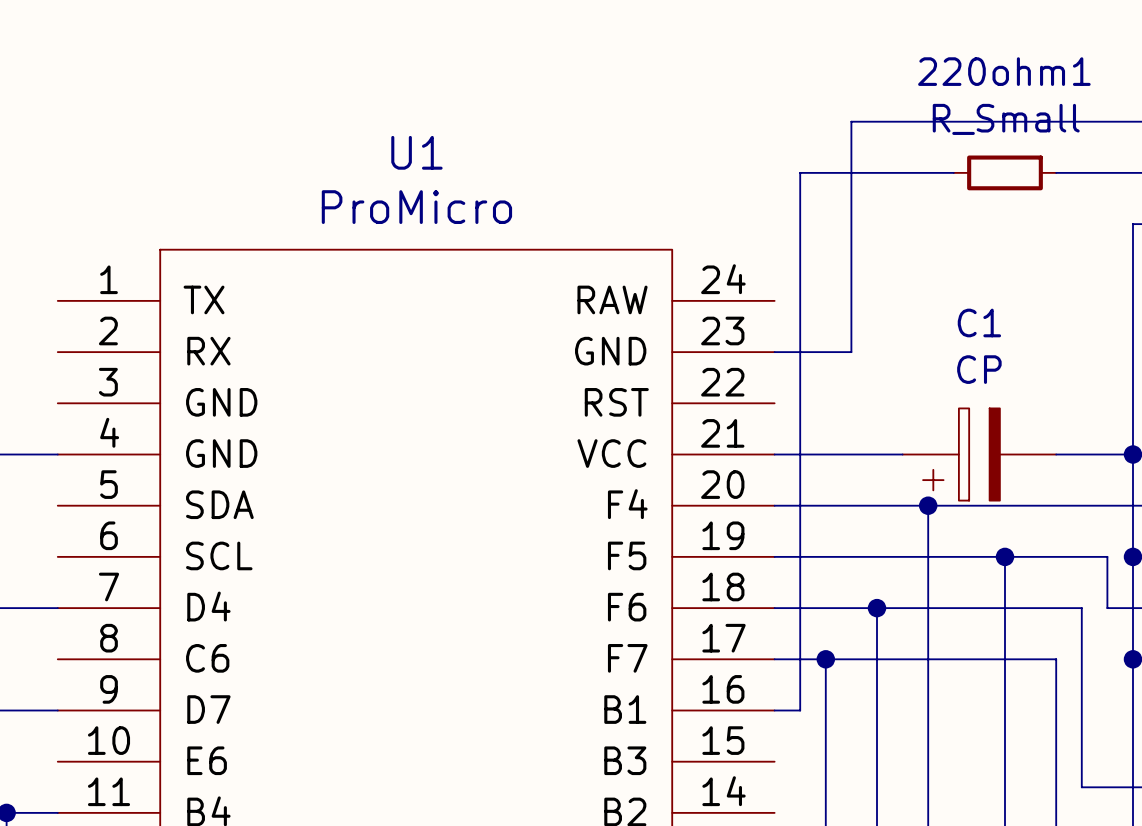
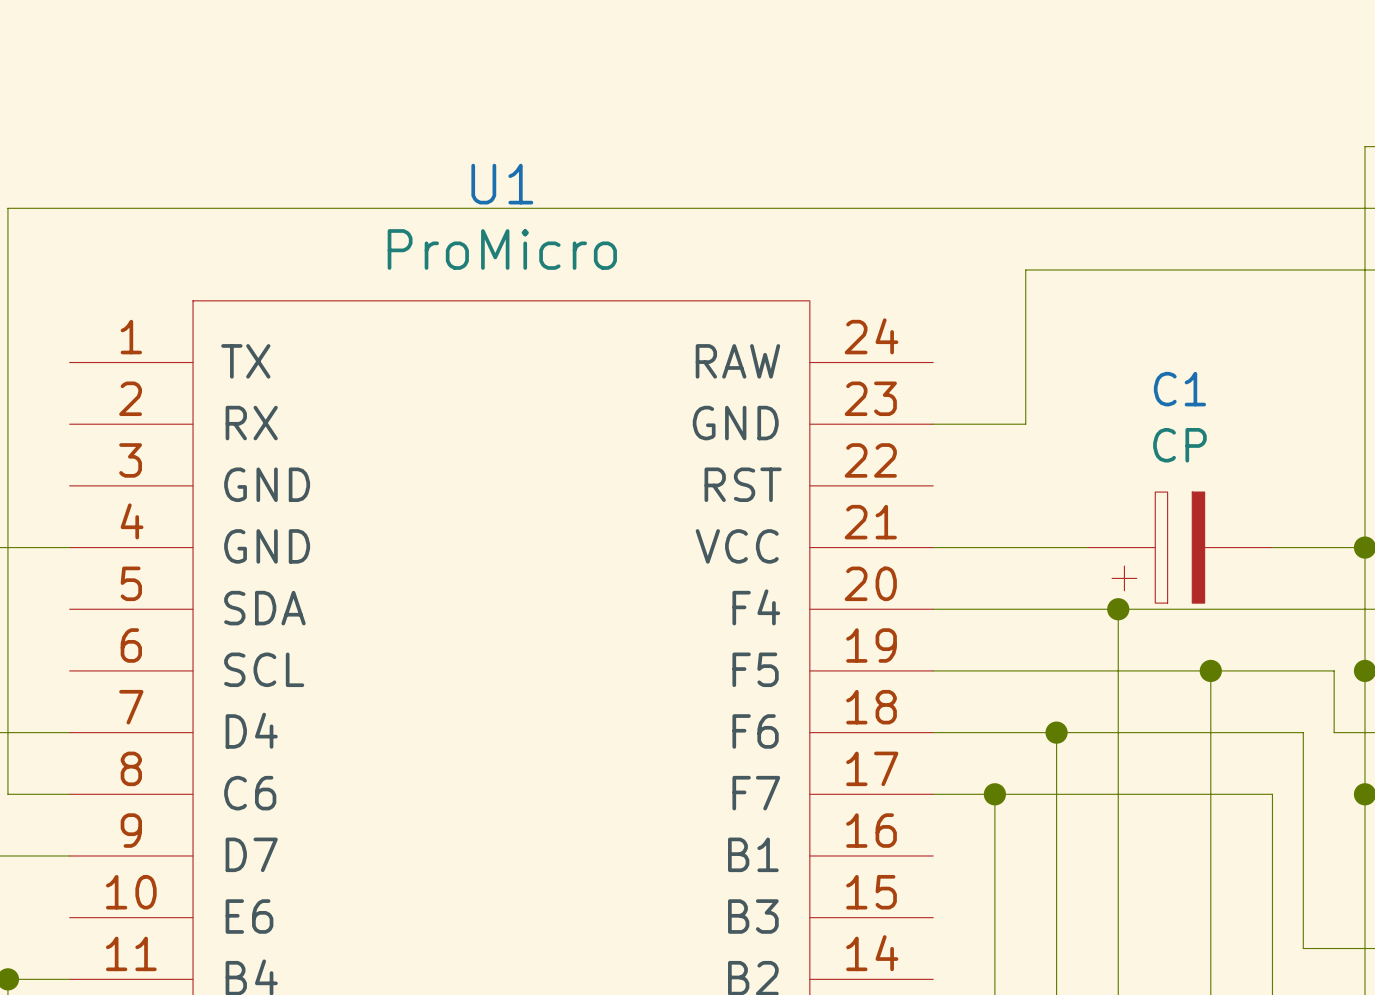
wire: (1132, 121) (851, 121) (851, 224) -> (1364, 146) (1364, 270) (1025, 270)
wire: (800, 172) (800, 710) (774, 710) -> (964, 208) (7, 208) (7, 794) (69, 794)
wire: none -> (1149, 208) (1272, 208)
220ohm1: R_Small (1004, 172) -> none

